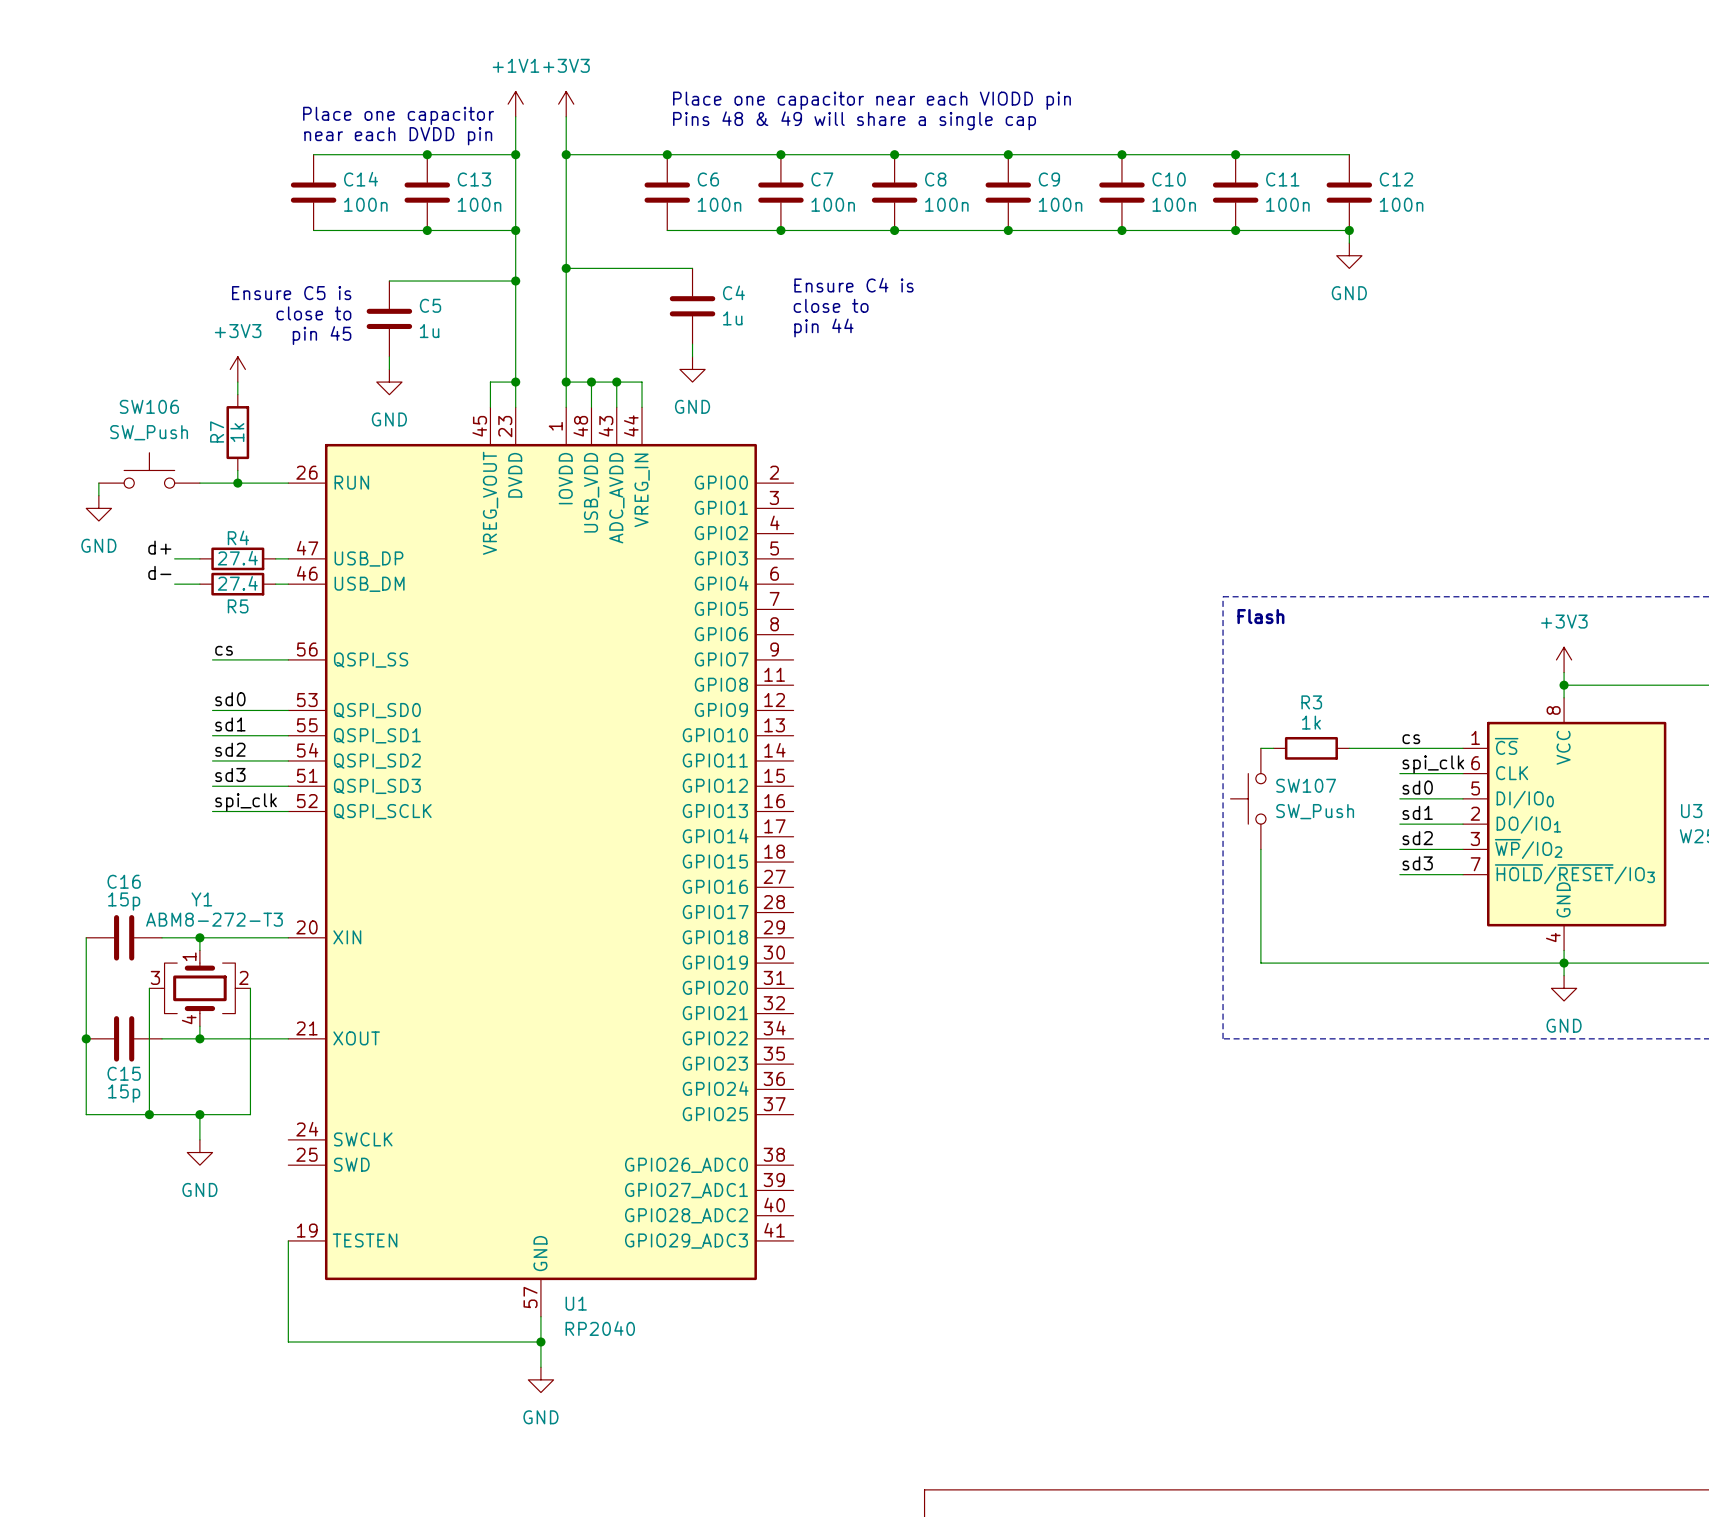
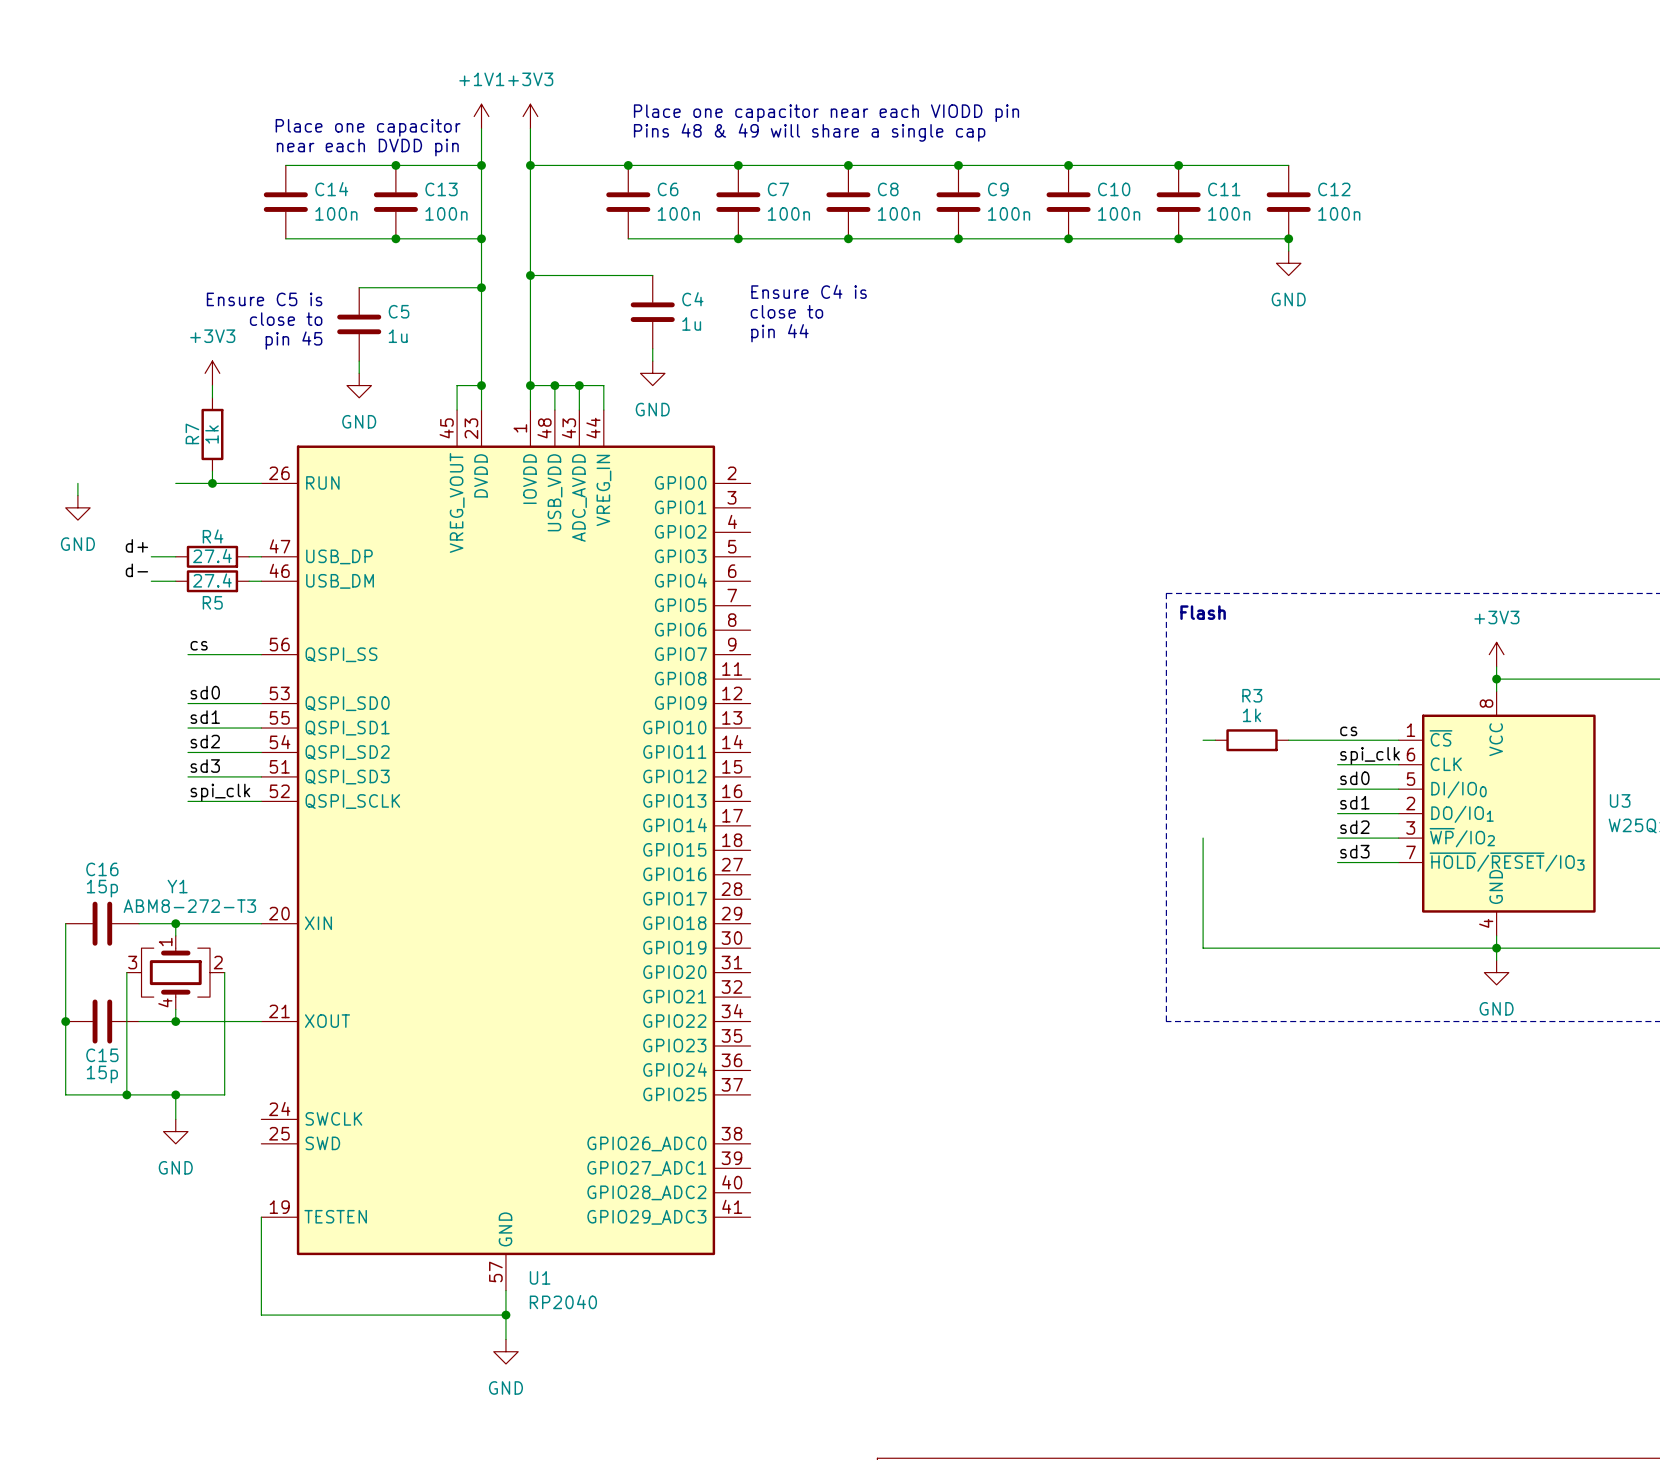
SW106: SW_Push (149, 470) -> none
SW107: SW_Push (1248, 798) -> none

